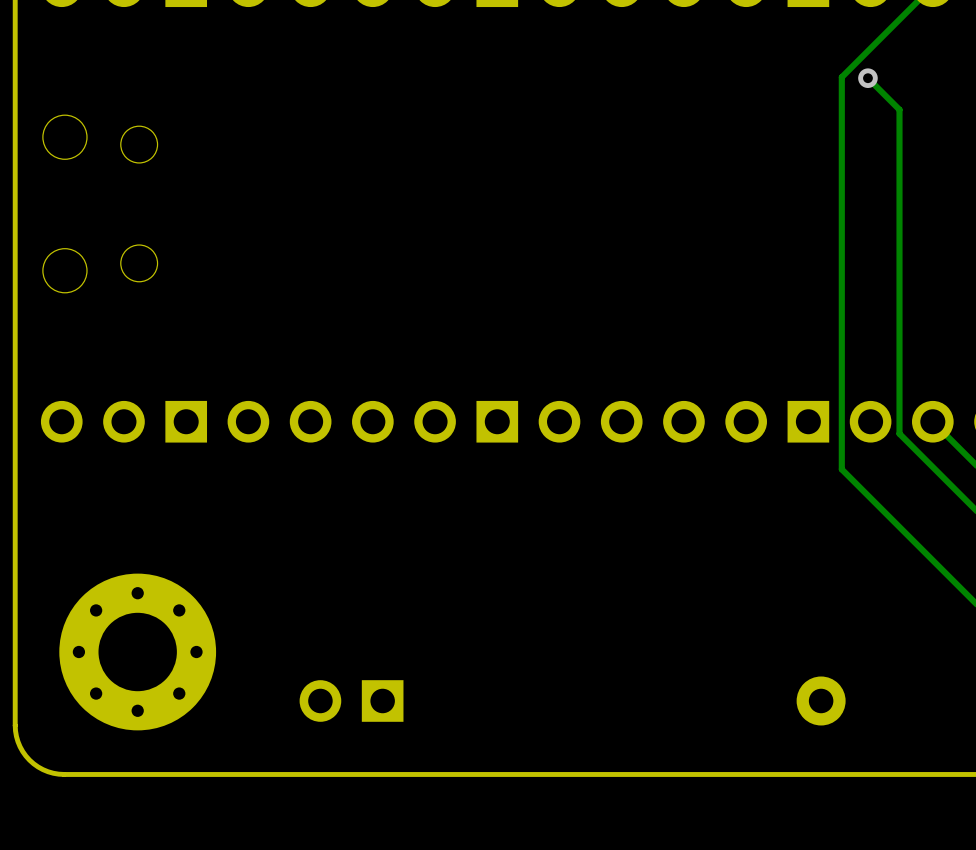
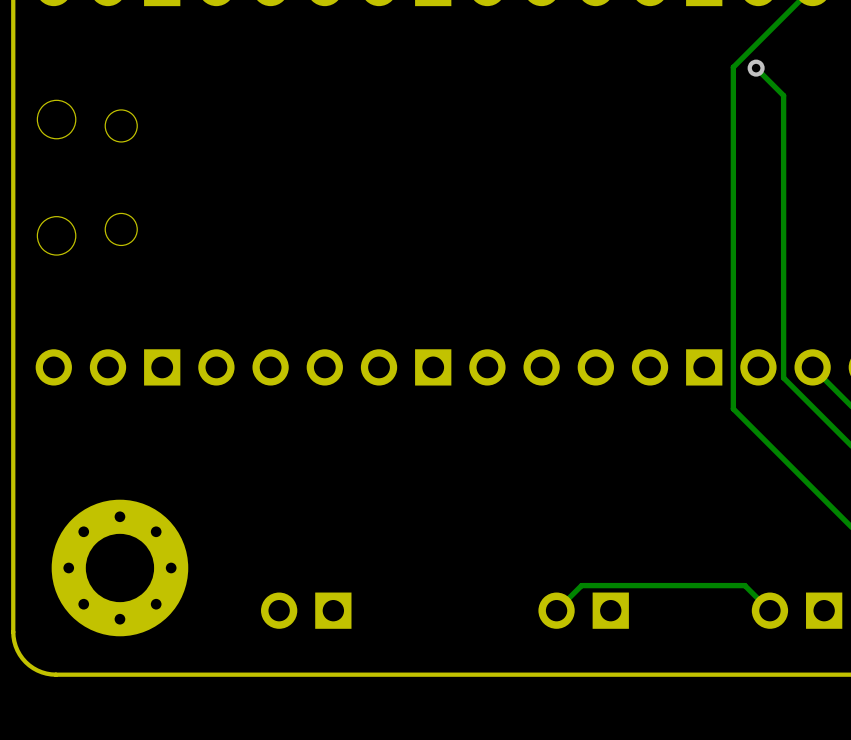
part: none -> (583, 610)
part: (821, 700) -> none
track: none -> (769, 610) (744, 585) (581, 585) (556, 610)
part: none -> (797, 610)

